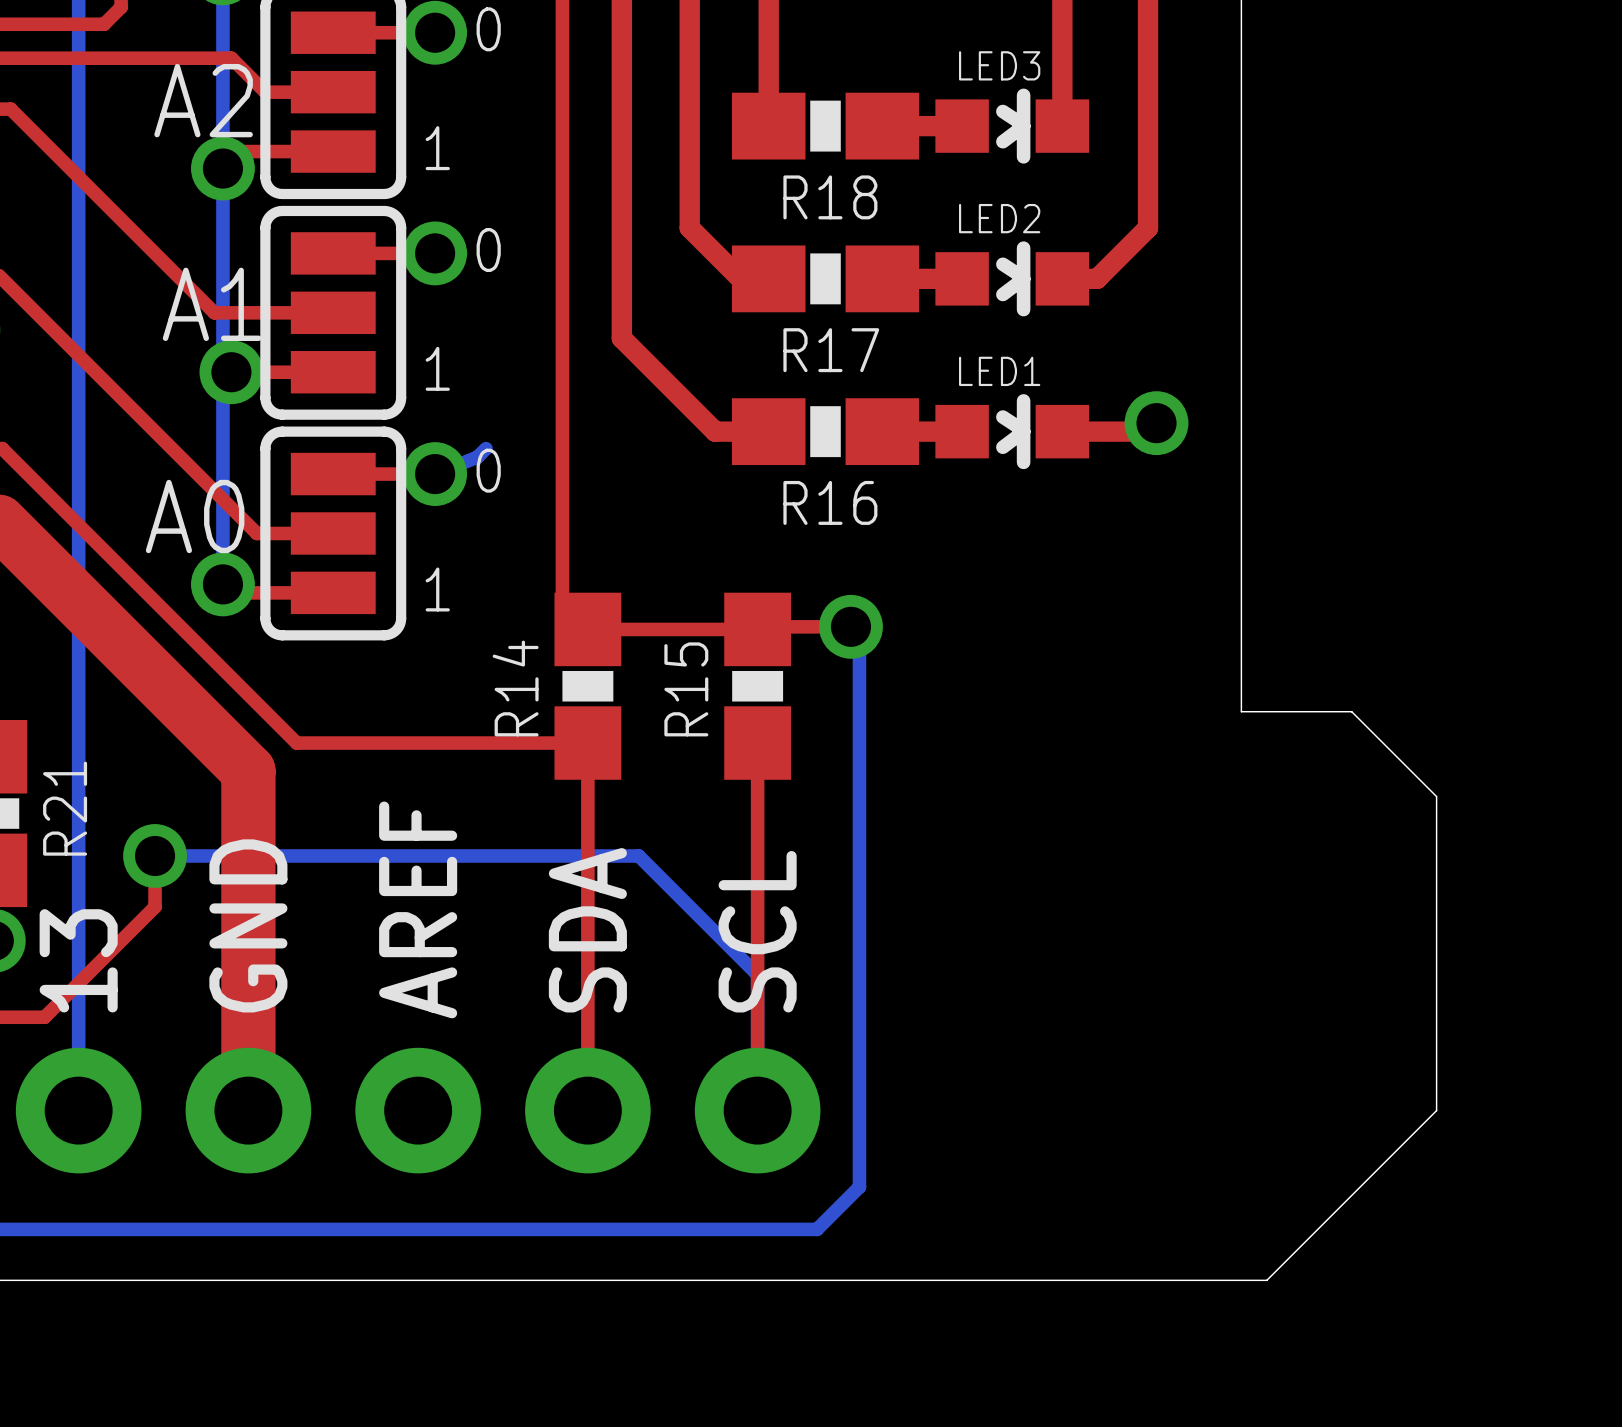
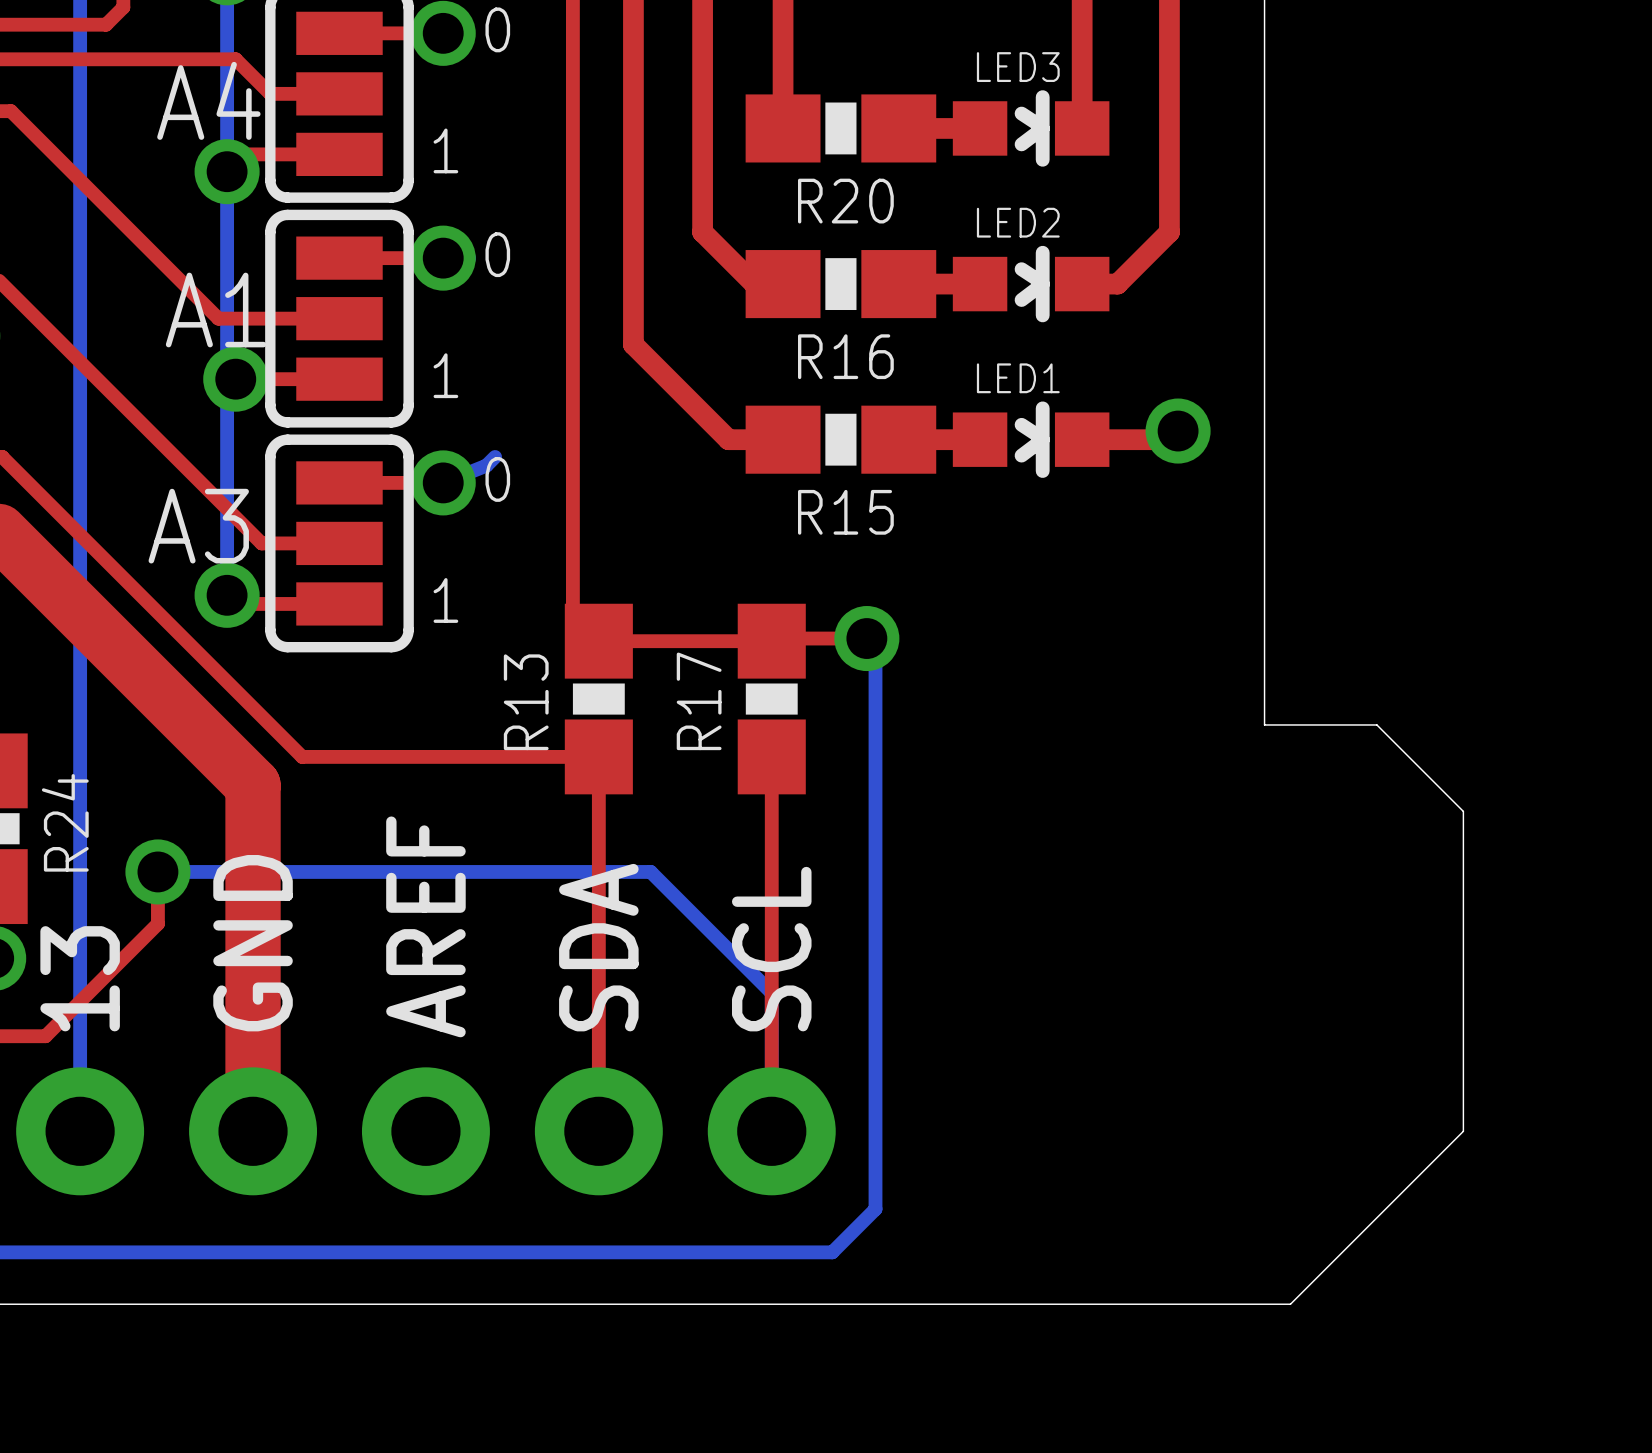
A2 name: A2 (203, 100) -> A4 (208, 100)
R18 name: R18 (830, 197) -> R20 (845, 201)
R17 name: R17 (831, 350) -> R16 (845, 356)
R16 name: R16 (830, 502) -> R15 (845, 512)
A0 name: A0 (195, 516) -> A3 (198, 526)
R14 name: R14 (515, 688) -> R13 (526, 702)
R15 name: R15 (686, 689) -> R17 (699, 701)
R21 name: R21 (65, 808) -> R24 (65, 822)

